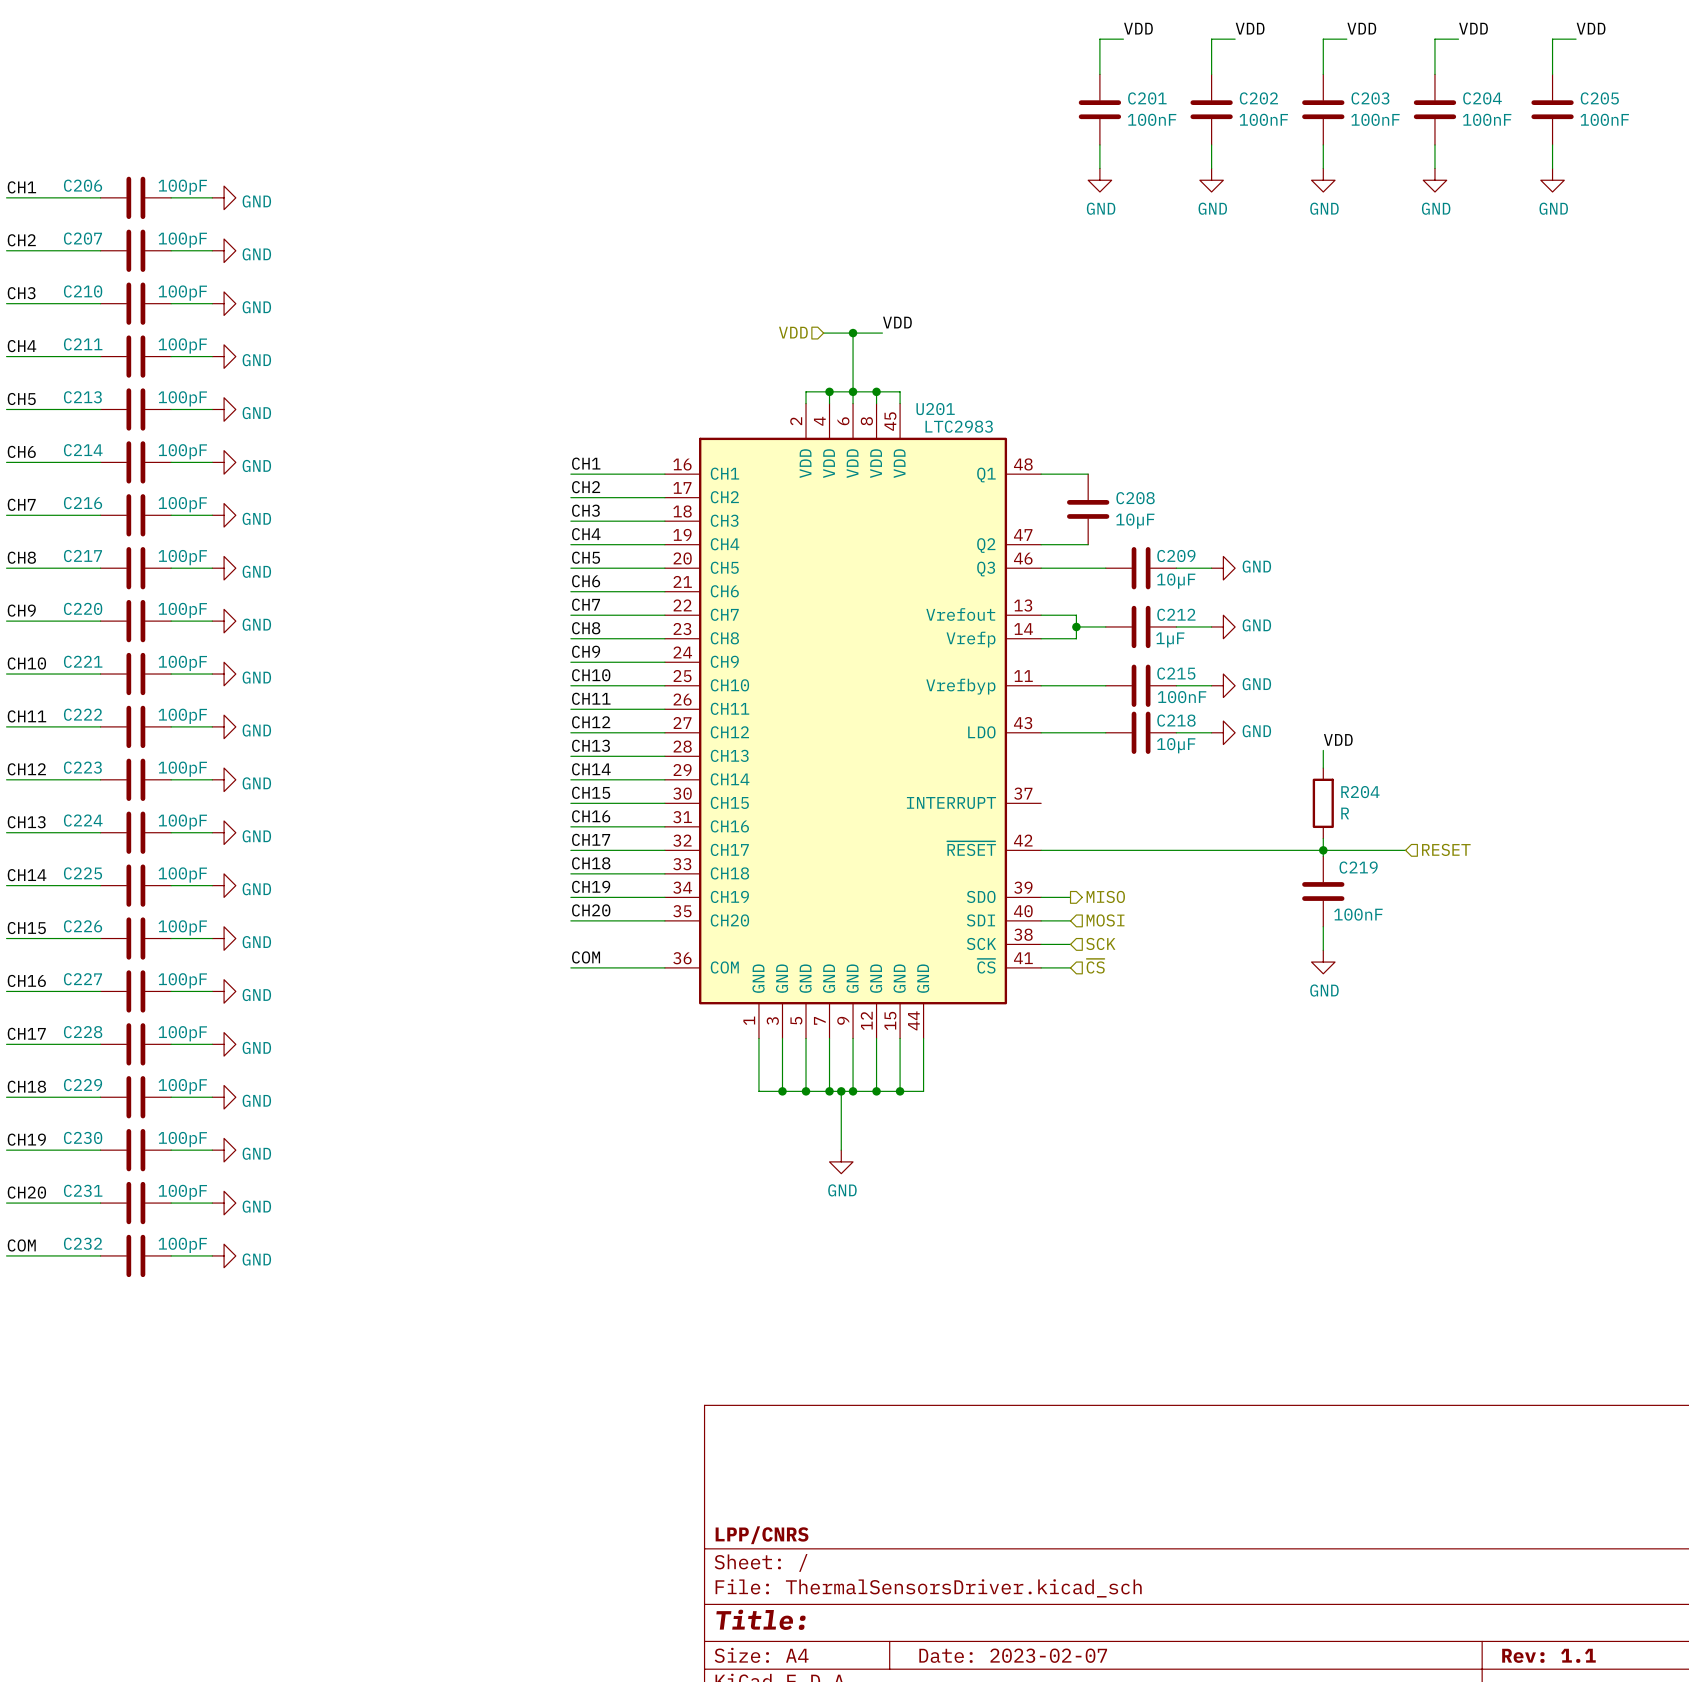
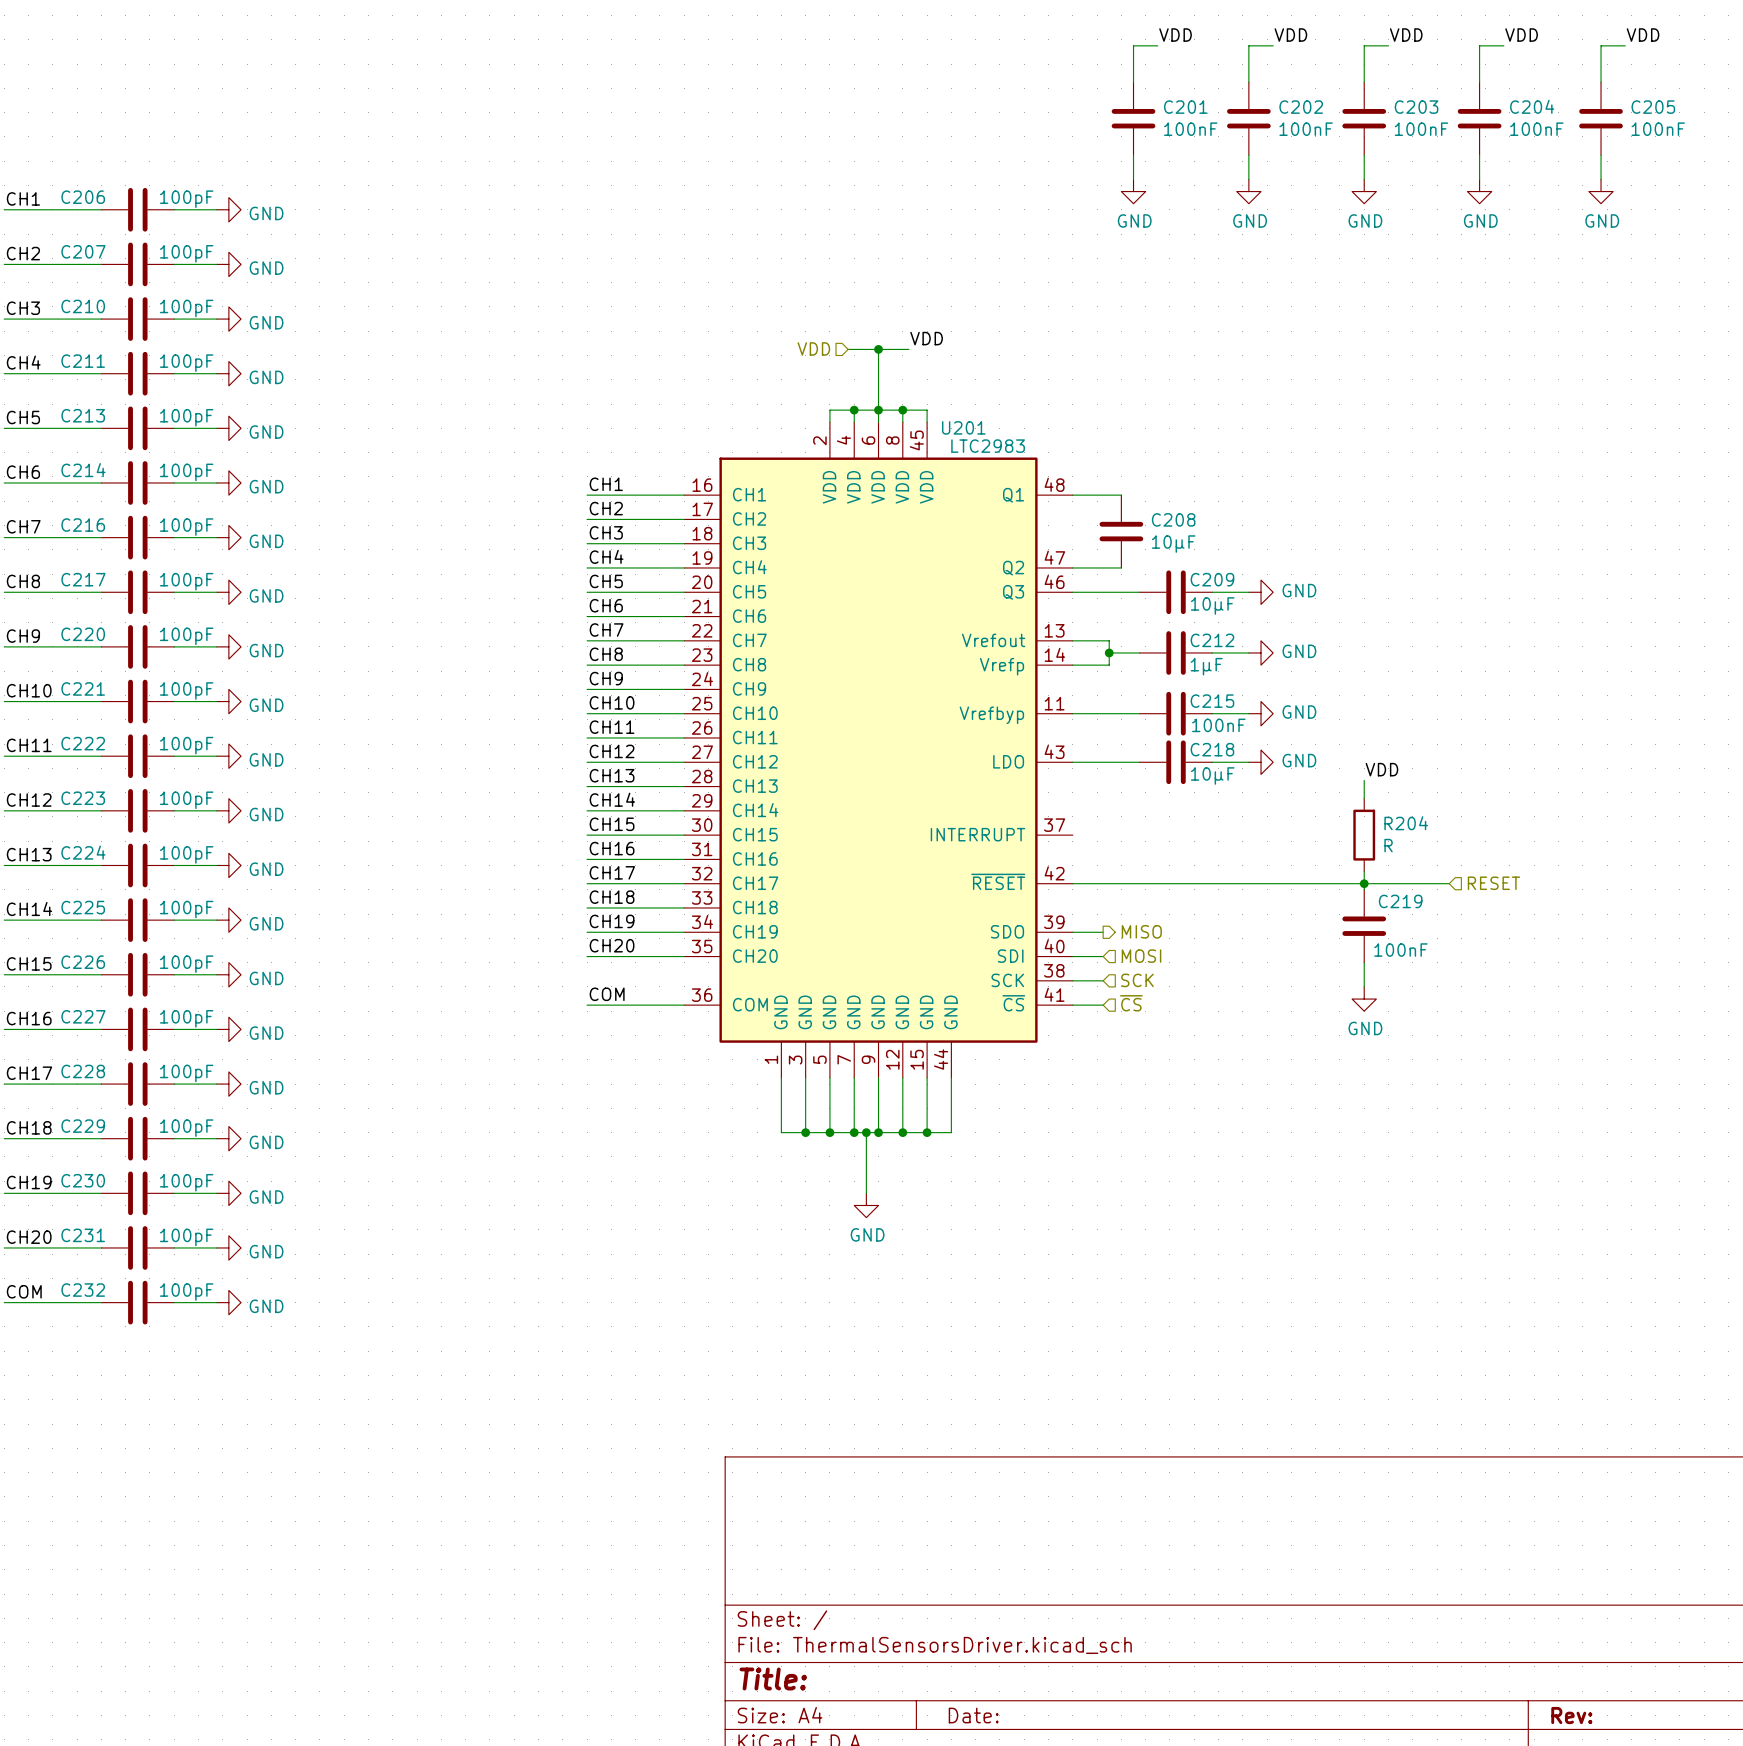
title block: LPP/CNRS (762, 1535) -> none
title block: Date: 2023-02-07 (1013, 1655) -> Date: (973, 1715)
title block: Rev: 1.1 (1548, 1655) -> Rev: (1571, 1715)

